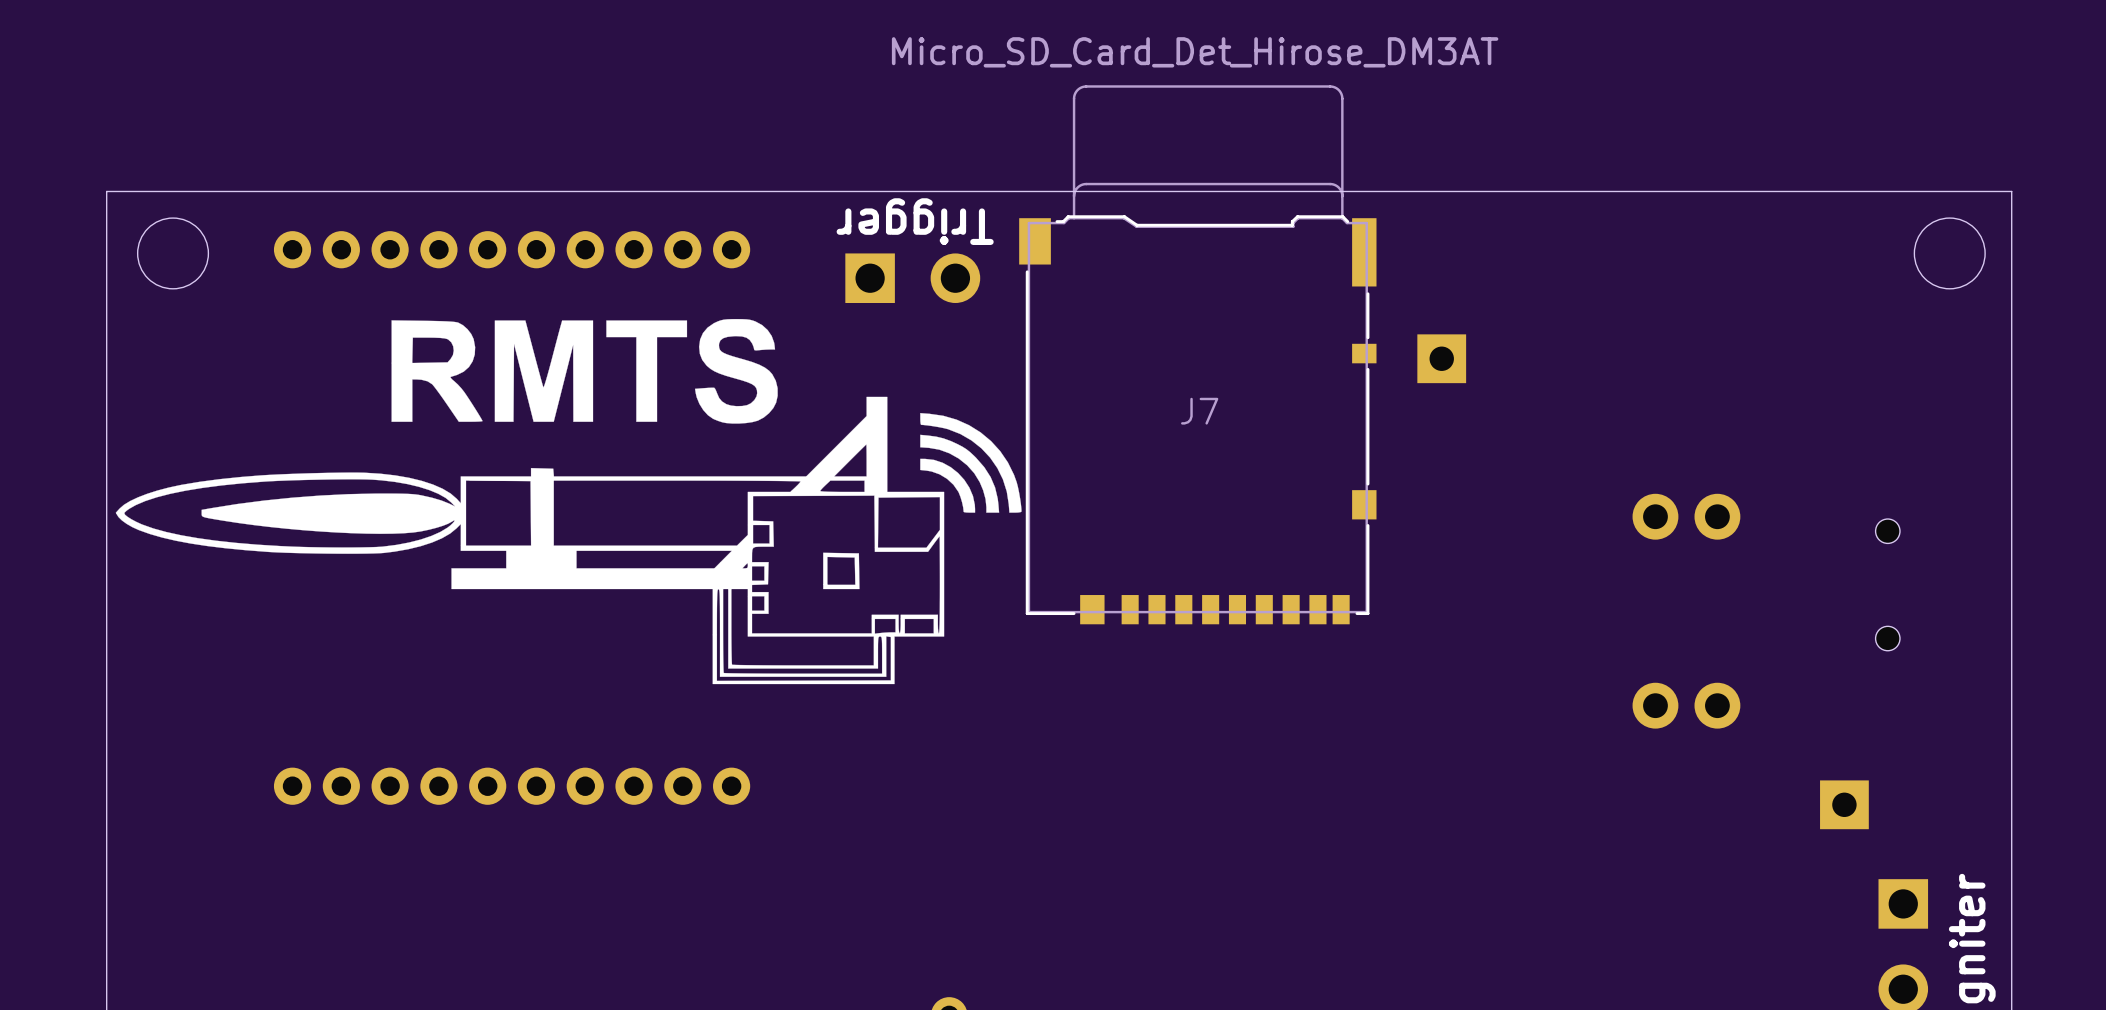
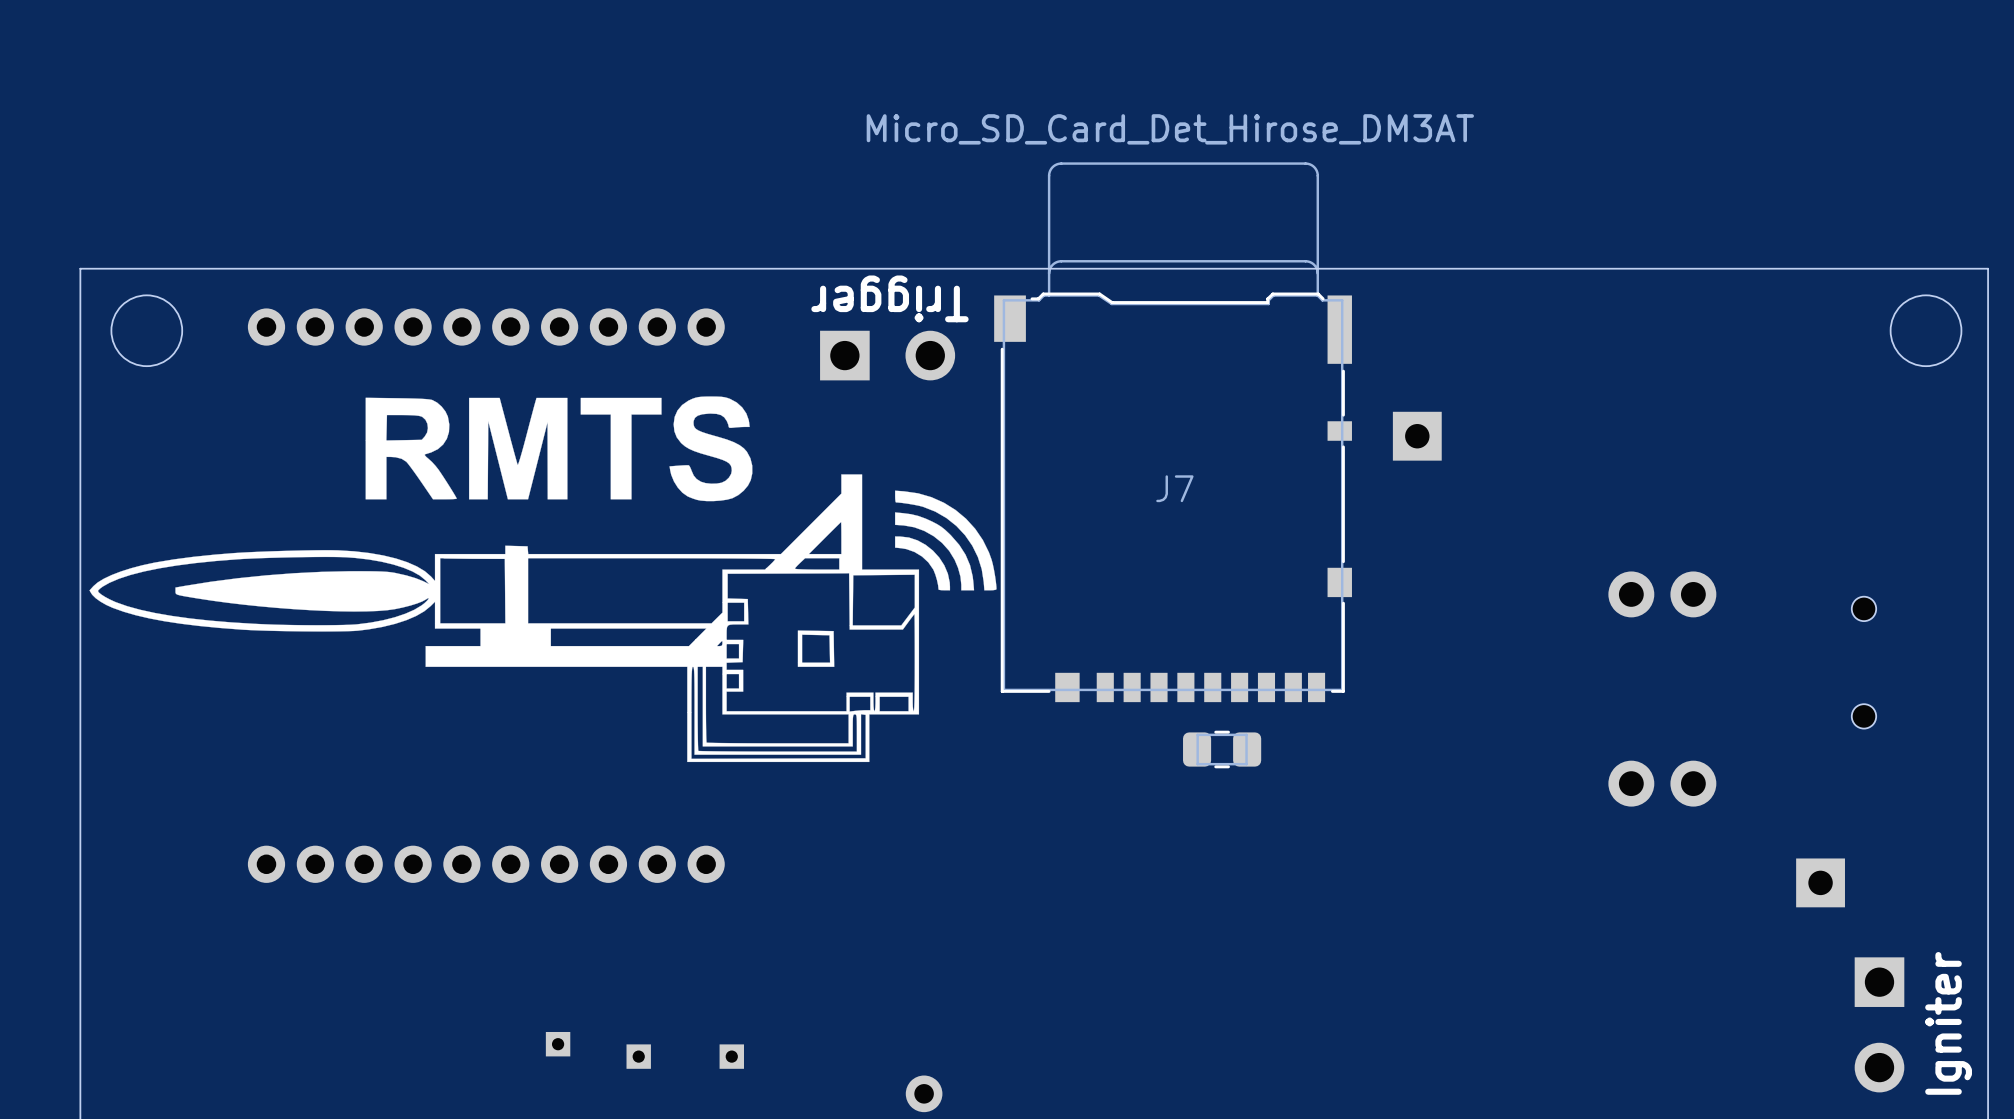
part: none -> (1222, 749)
part: none -> (558, 1044)
part: none -> (638, 1056)
part: none -> (731, 1056)

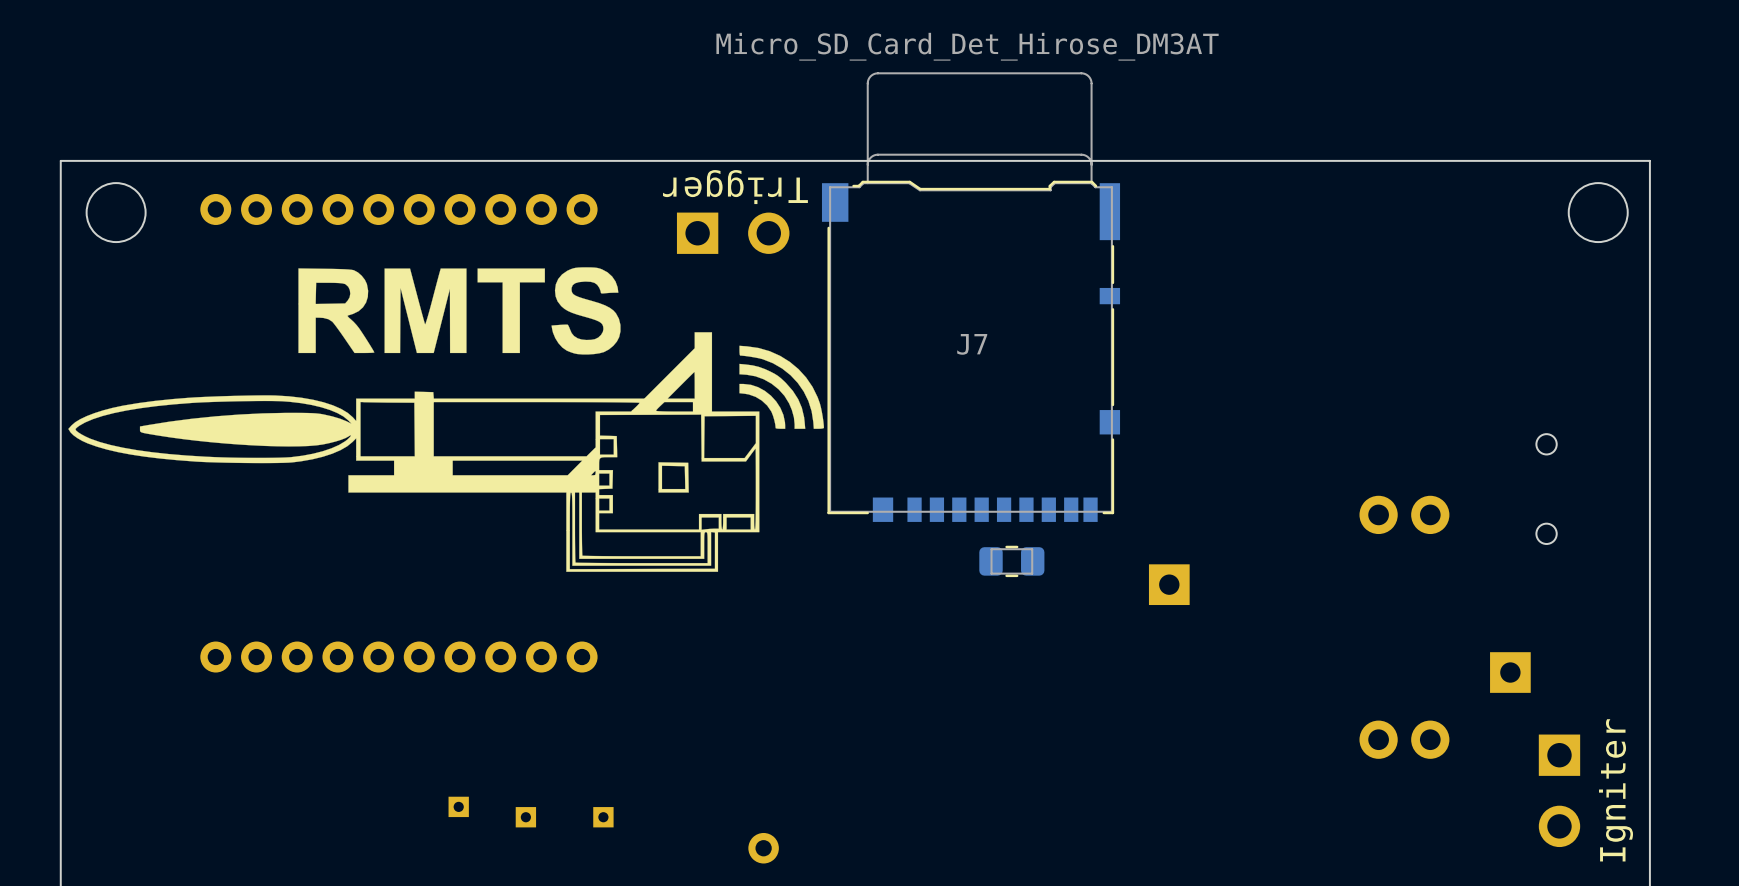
part position: (1417, 436) -> (1169, 584)
part: (1662, 594) -> none
part: none -> (1404, 514)
part: (1662, 783) -> none
part: none -> (1404, 739)

